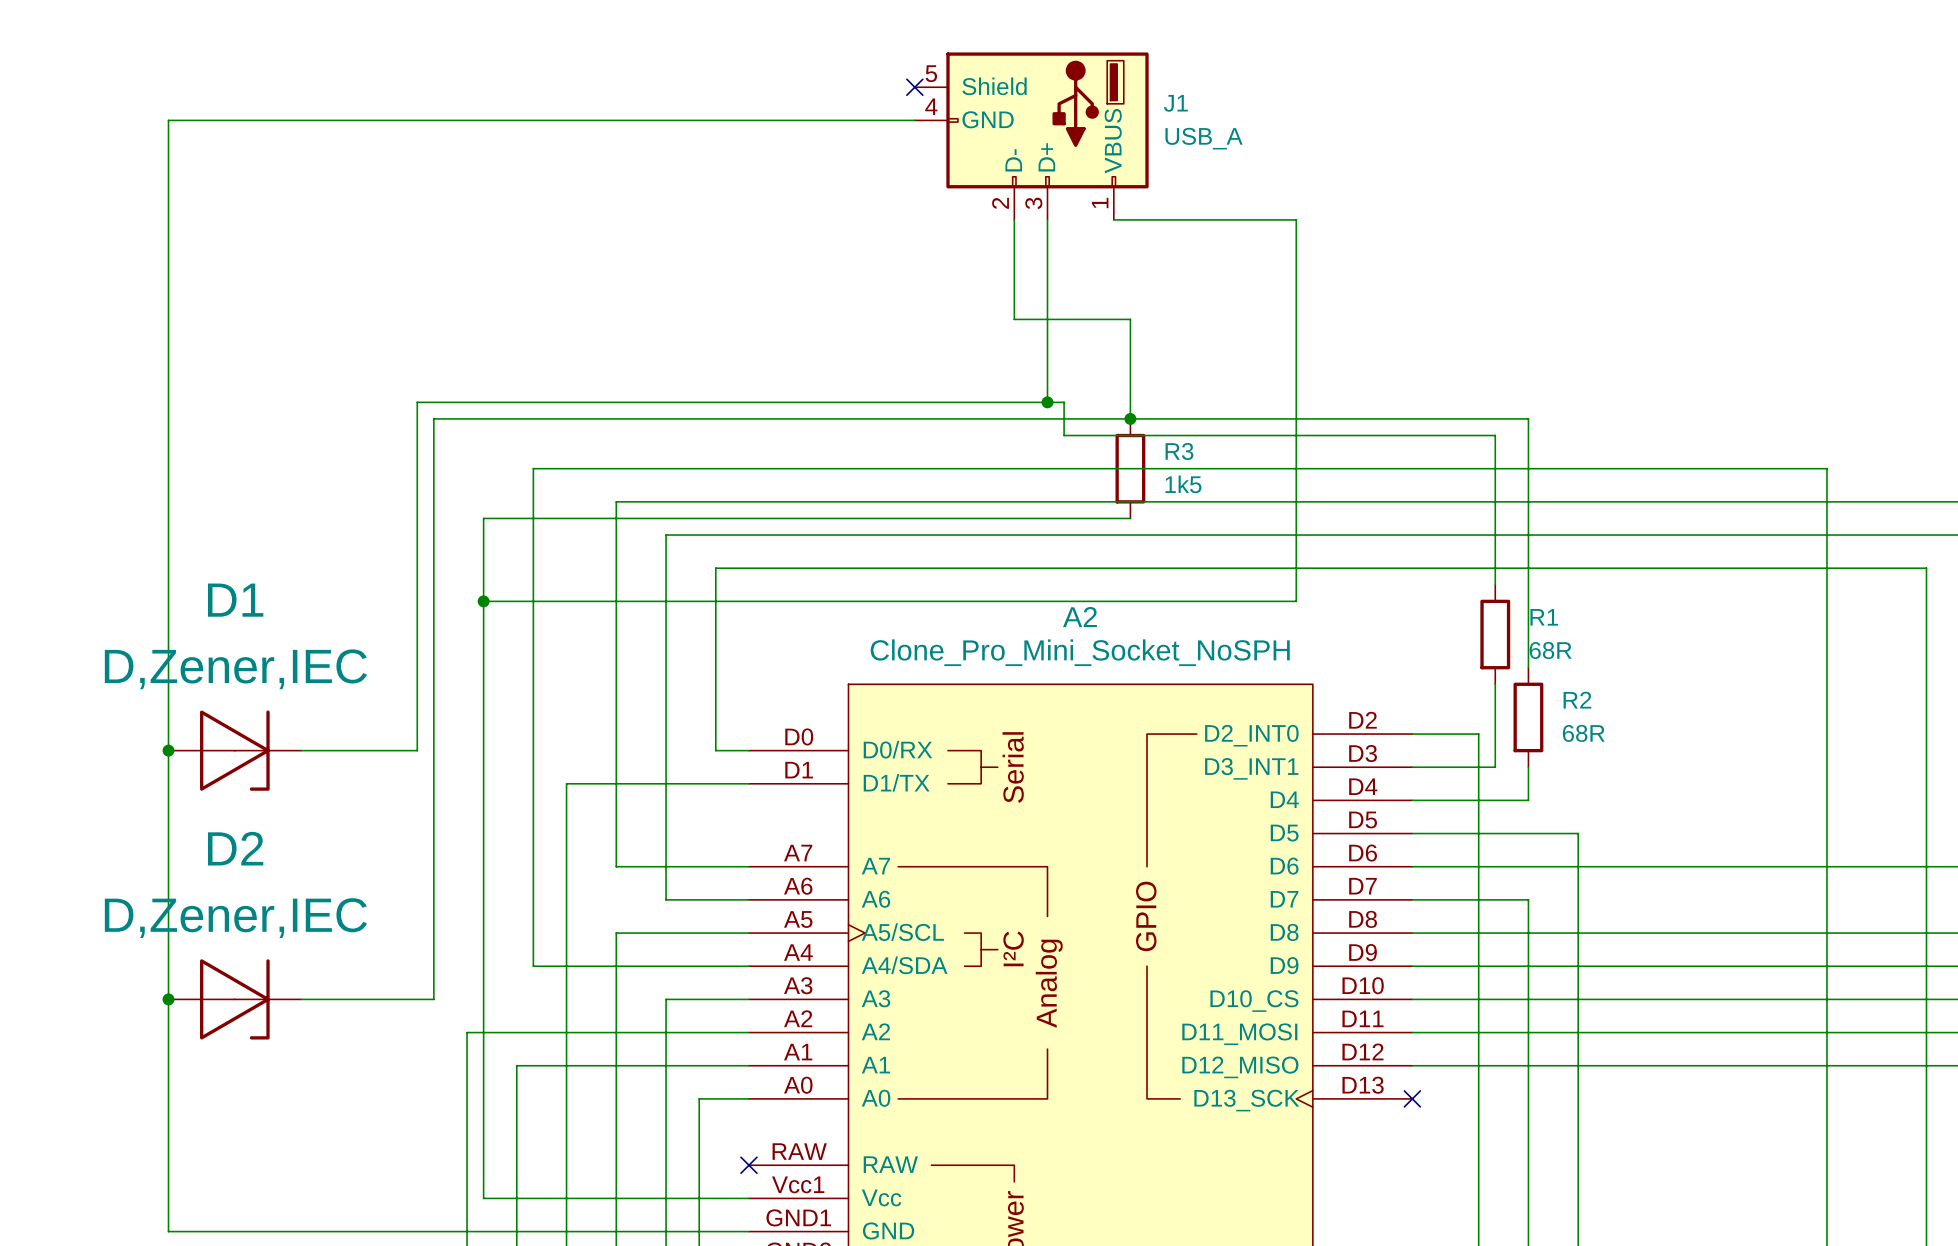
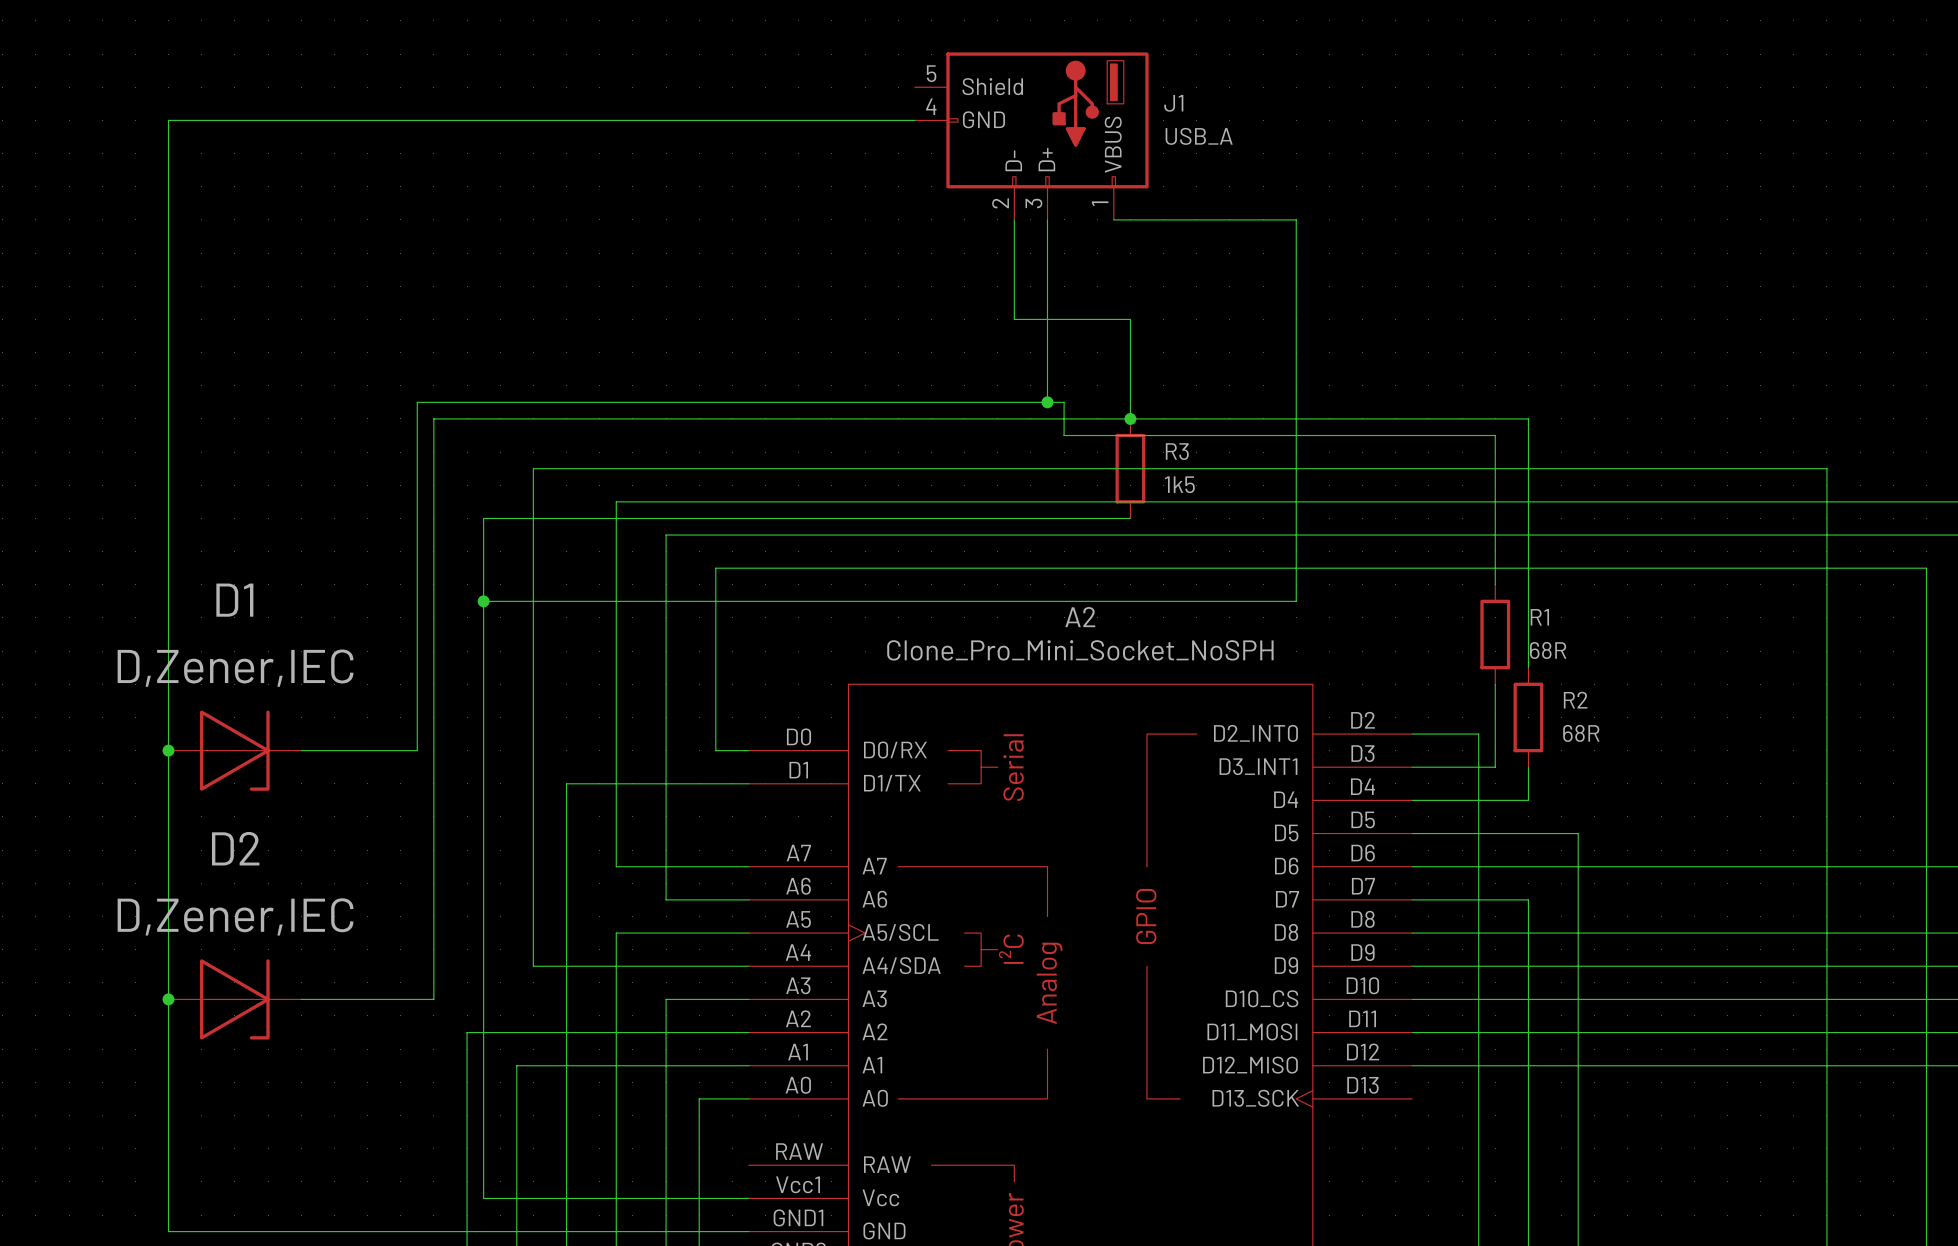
no-connect mark: (914, 87) -> none
no-connect mark: (1412, 1098) -> none
no-connect mark: (748, 1165) -> none

